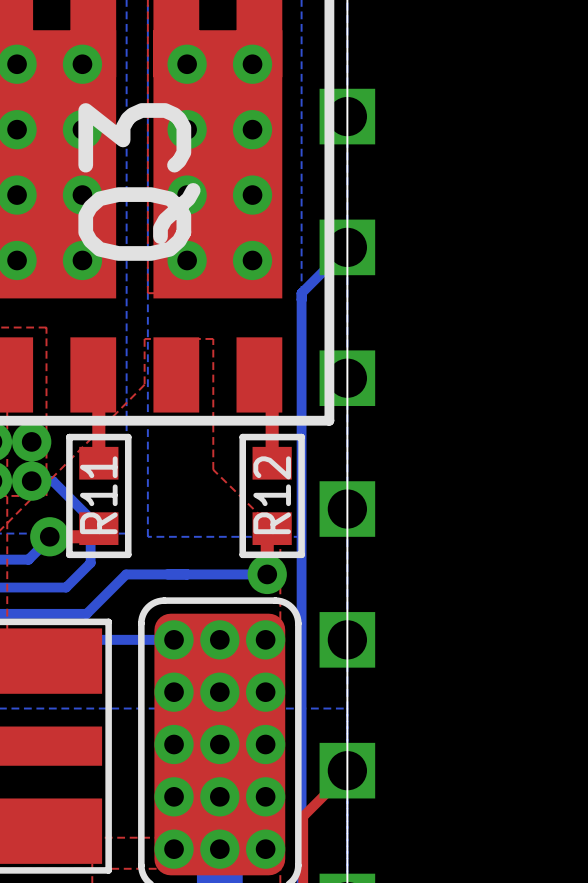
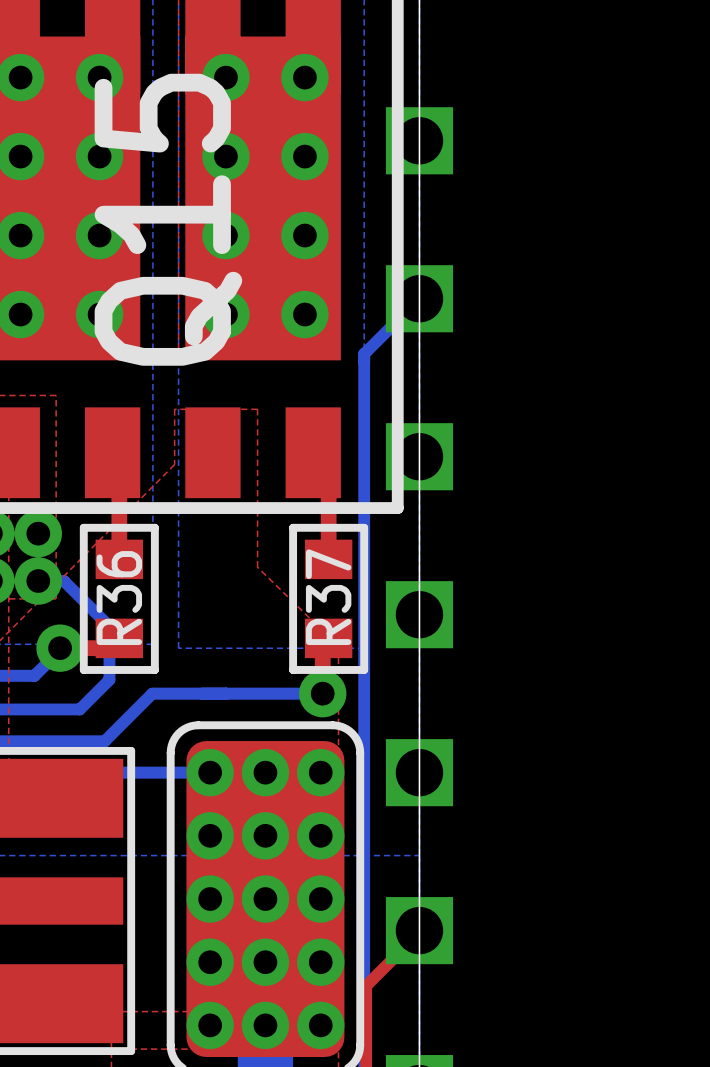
Q3 name: Q3 (139, 181) -> Q15 (168, 219)
R11 name: R11 (98, 495) -> R36 (119, 598)
R12 name: R12 (272, 495) -> R37 (328, 597)

